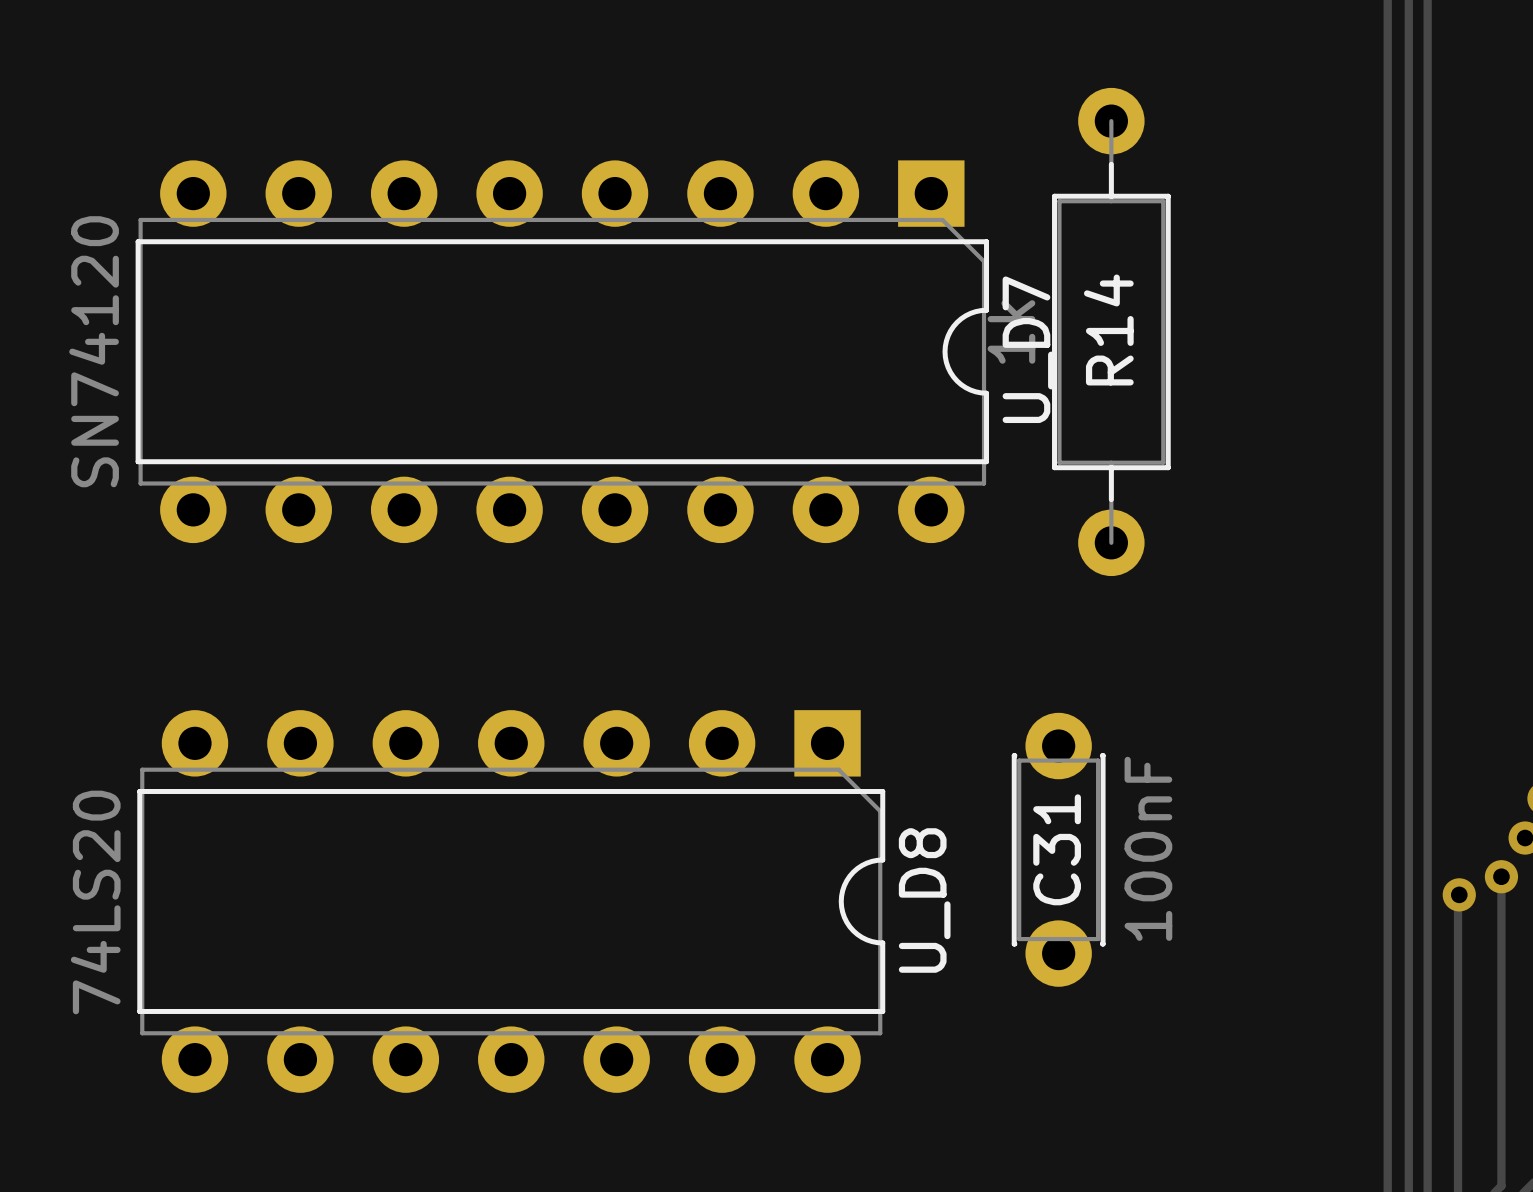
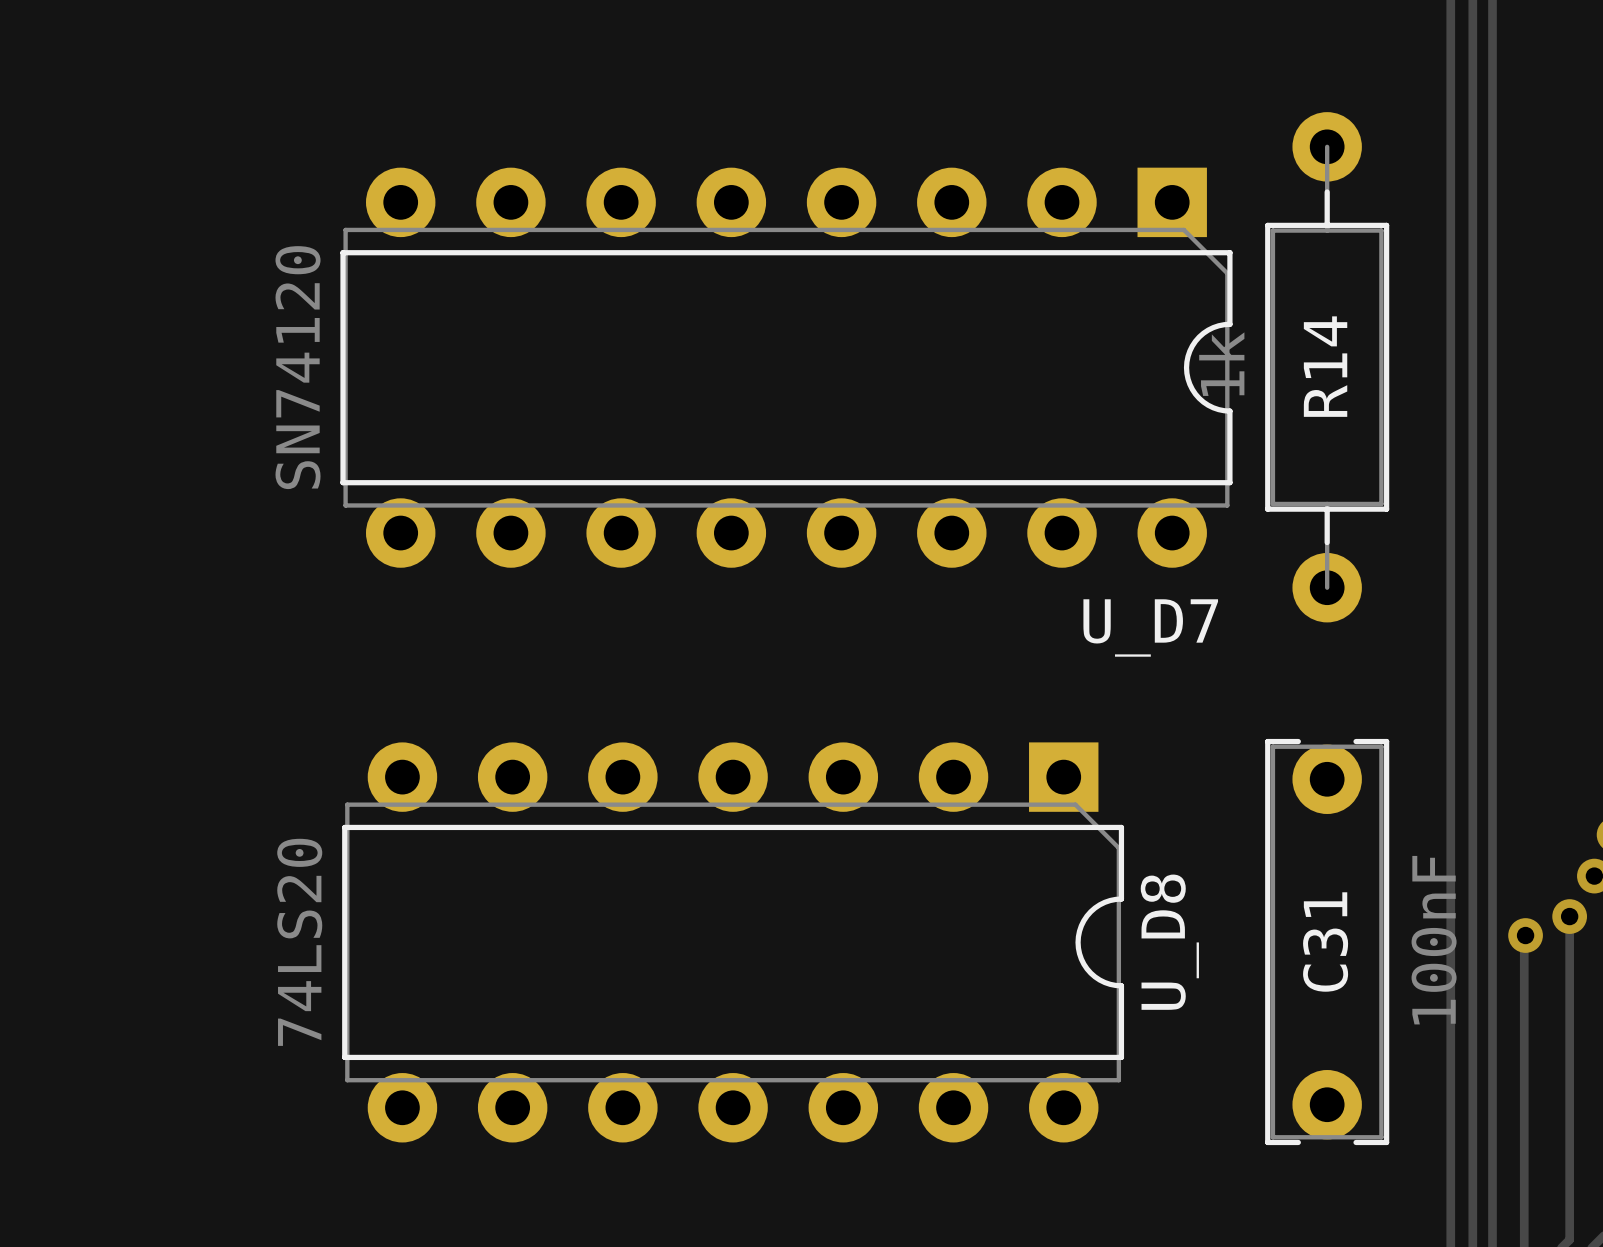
R14 position: (1111, 331) -> (1327, 367)
U_D7 name rotation: 0° (1028, 349) -> 90° clockwise (1150, 627)
U_D7 name position: U_D7 (1028, 349) -> U_D7 (1150, 627)
U_D7 position: (562, 351) -> (786, 367)
C31 footprint: [1011, 712, 1106, 987] -> [1265, 738, 1390, 1146]
U_D8 position: (511, 901) -> (733, 942)

